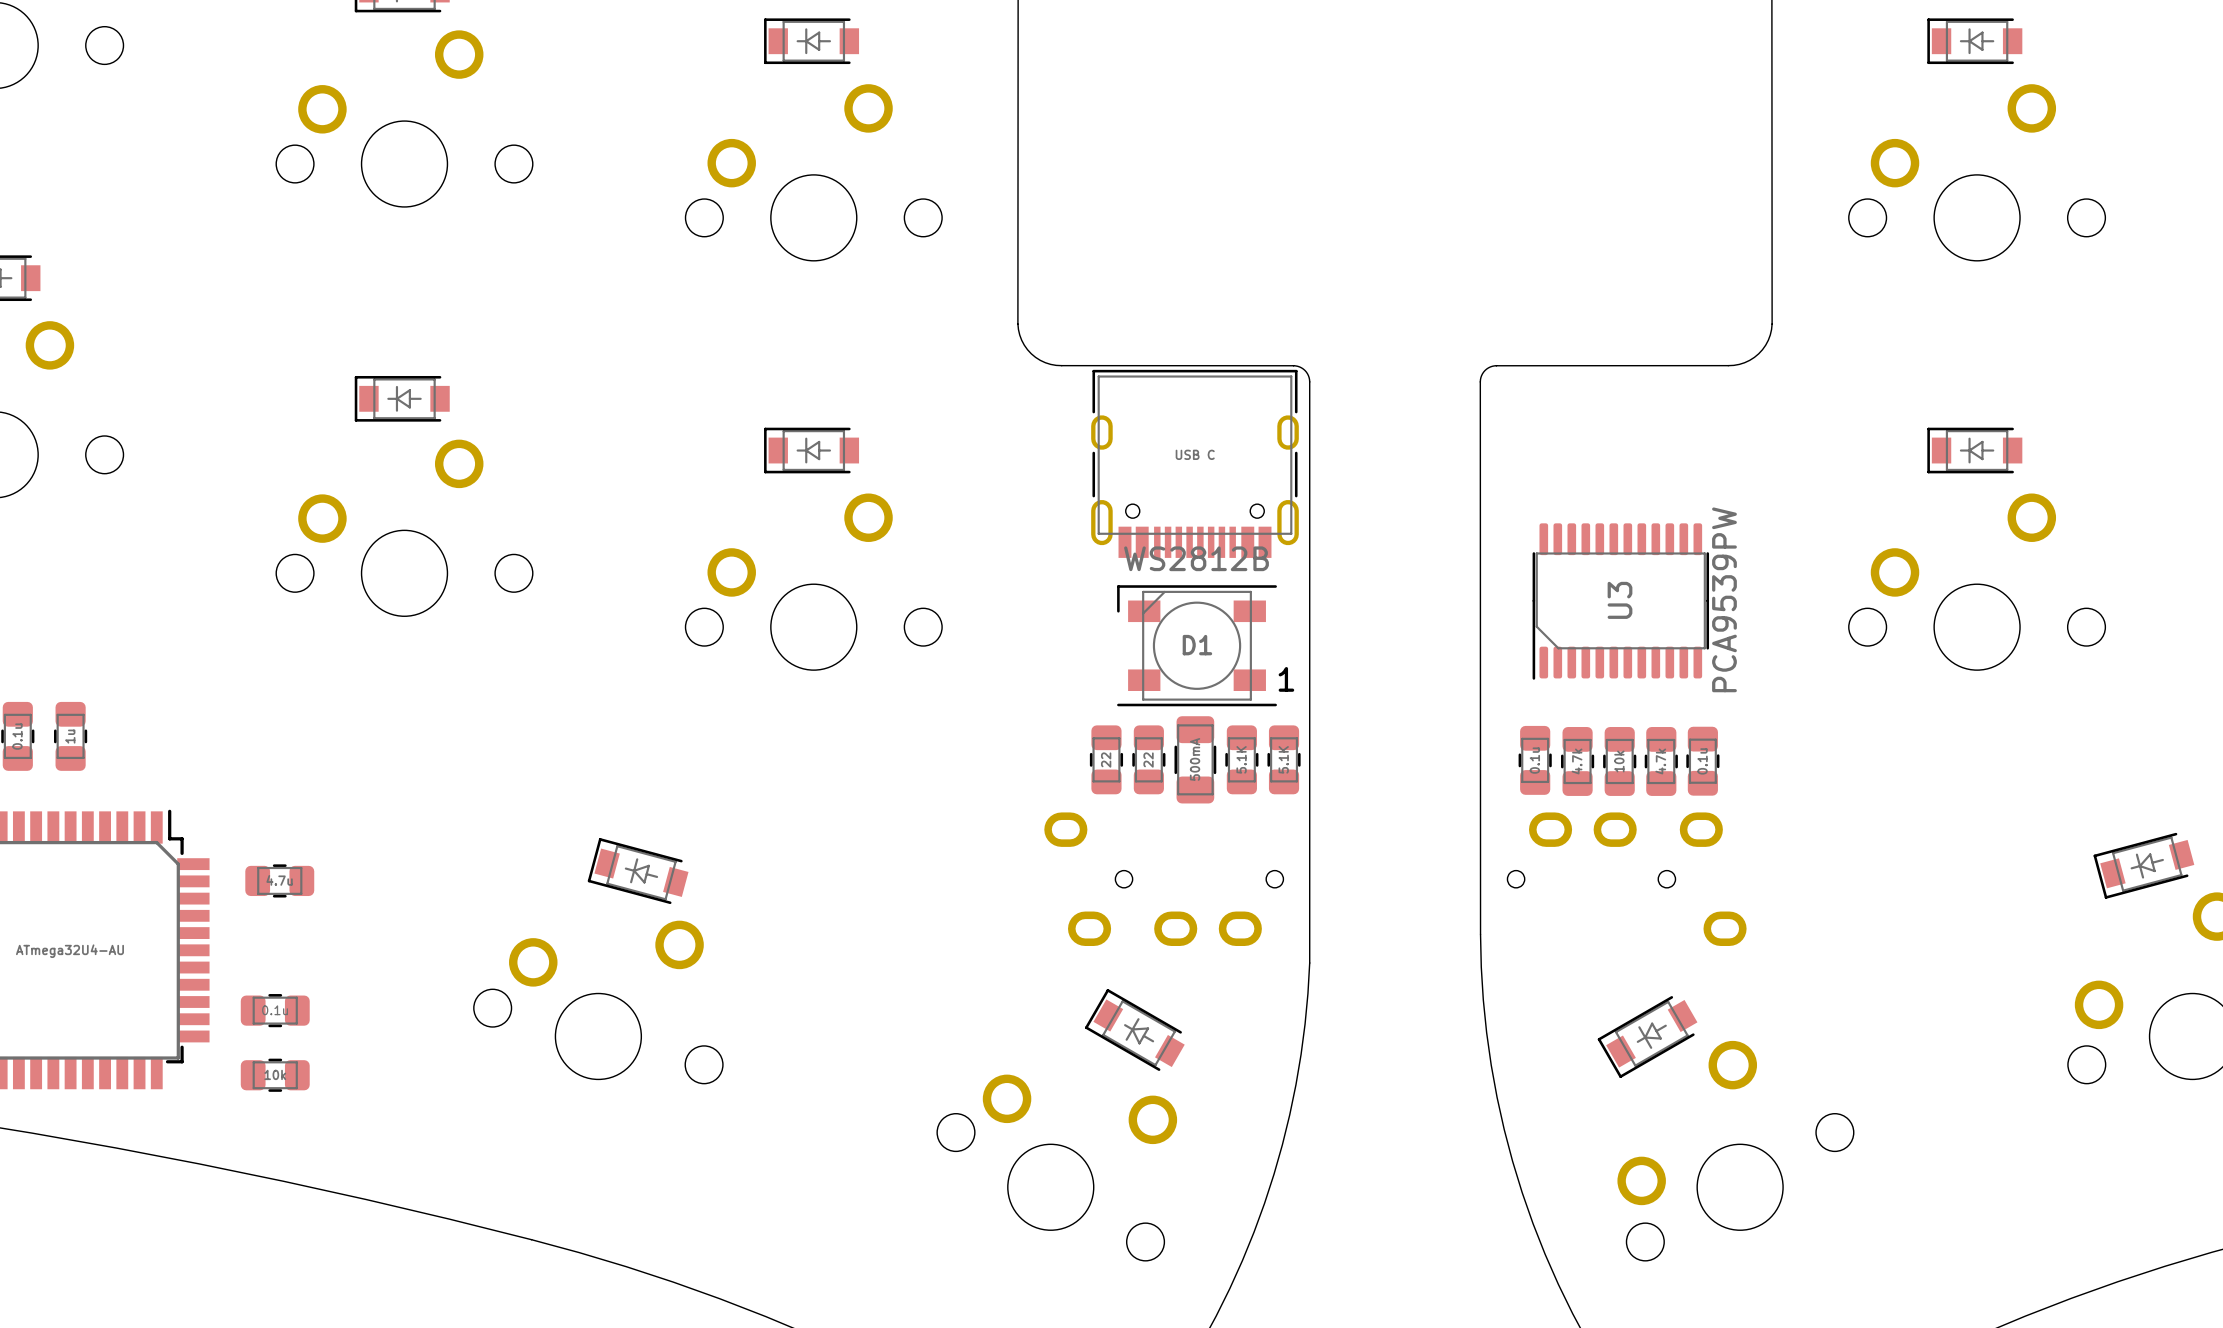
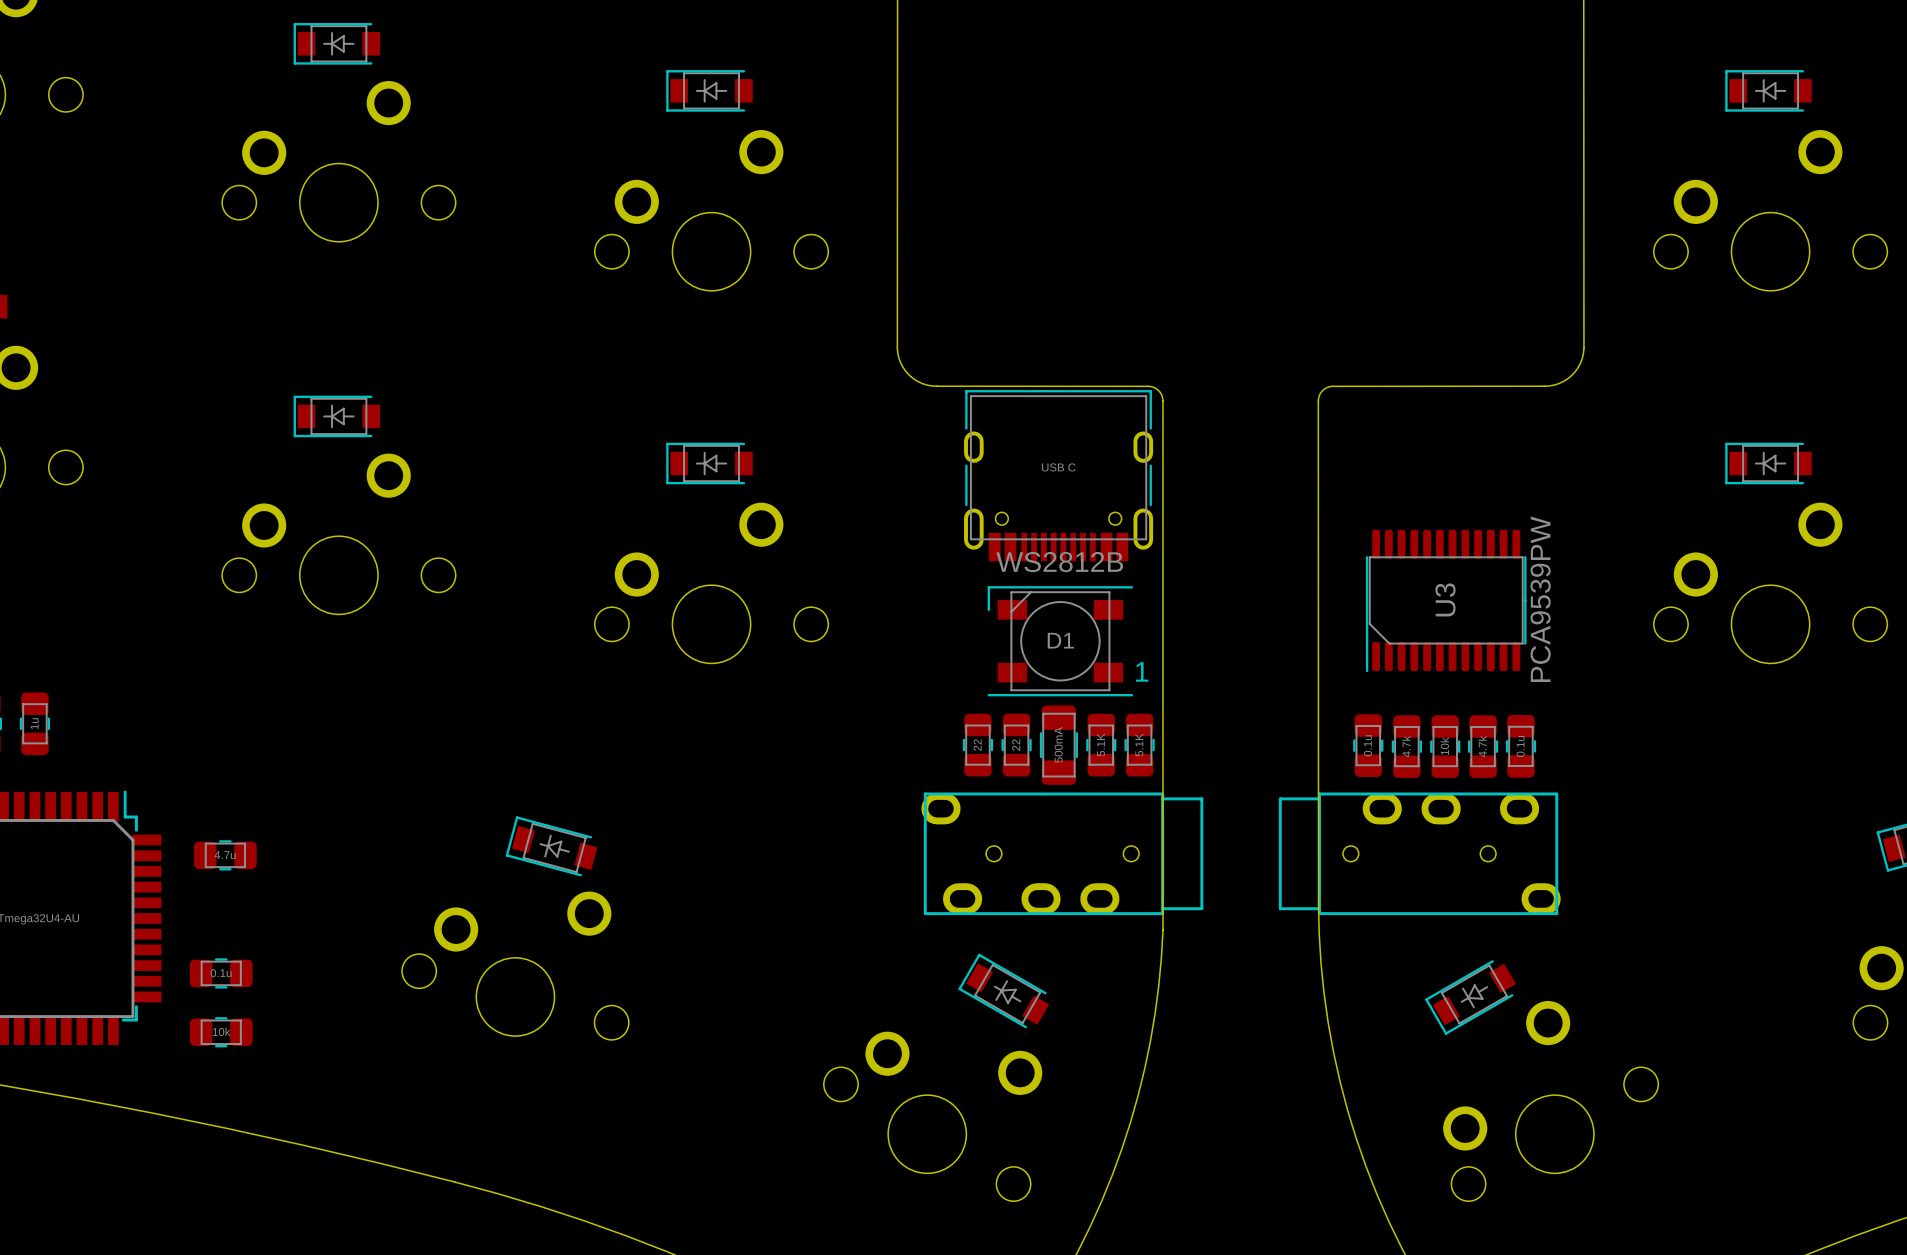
part: (1163, 879) -> none
part: none -> (1062, 853)
part: none -> (1419, 853)
part: (1627, 879) -> none

